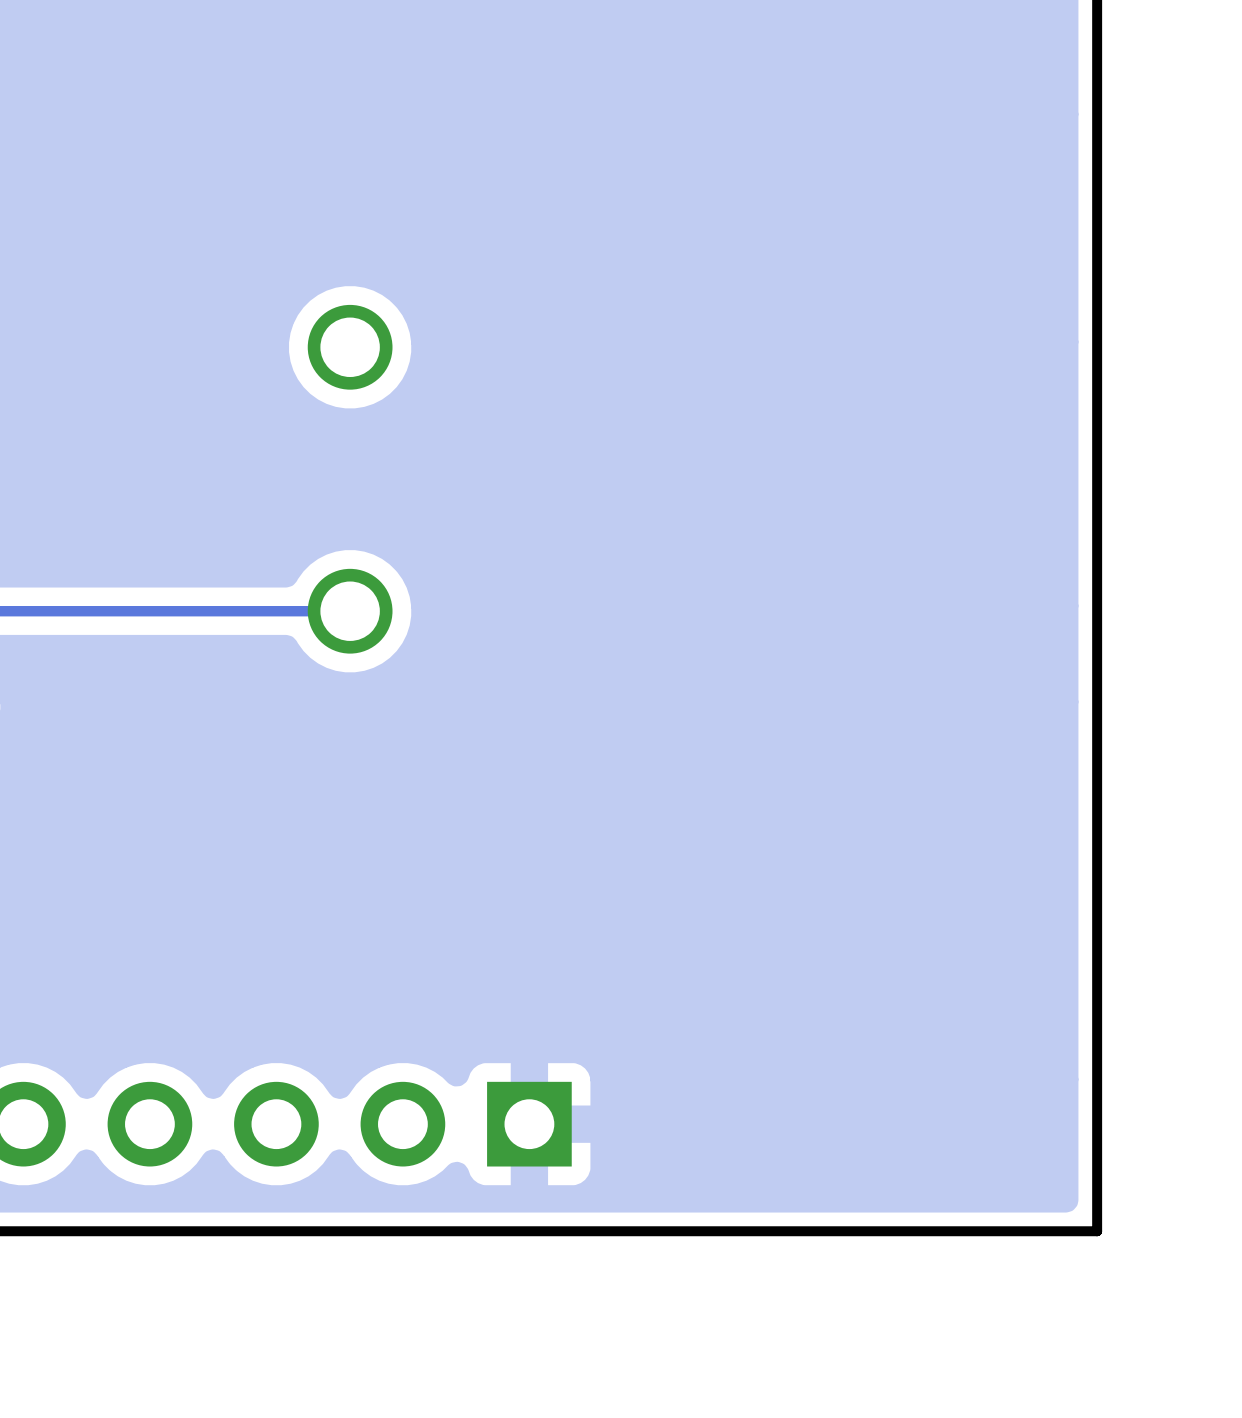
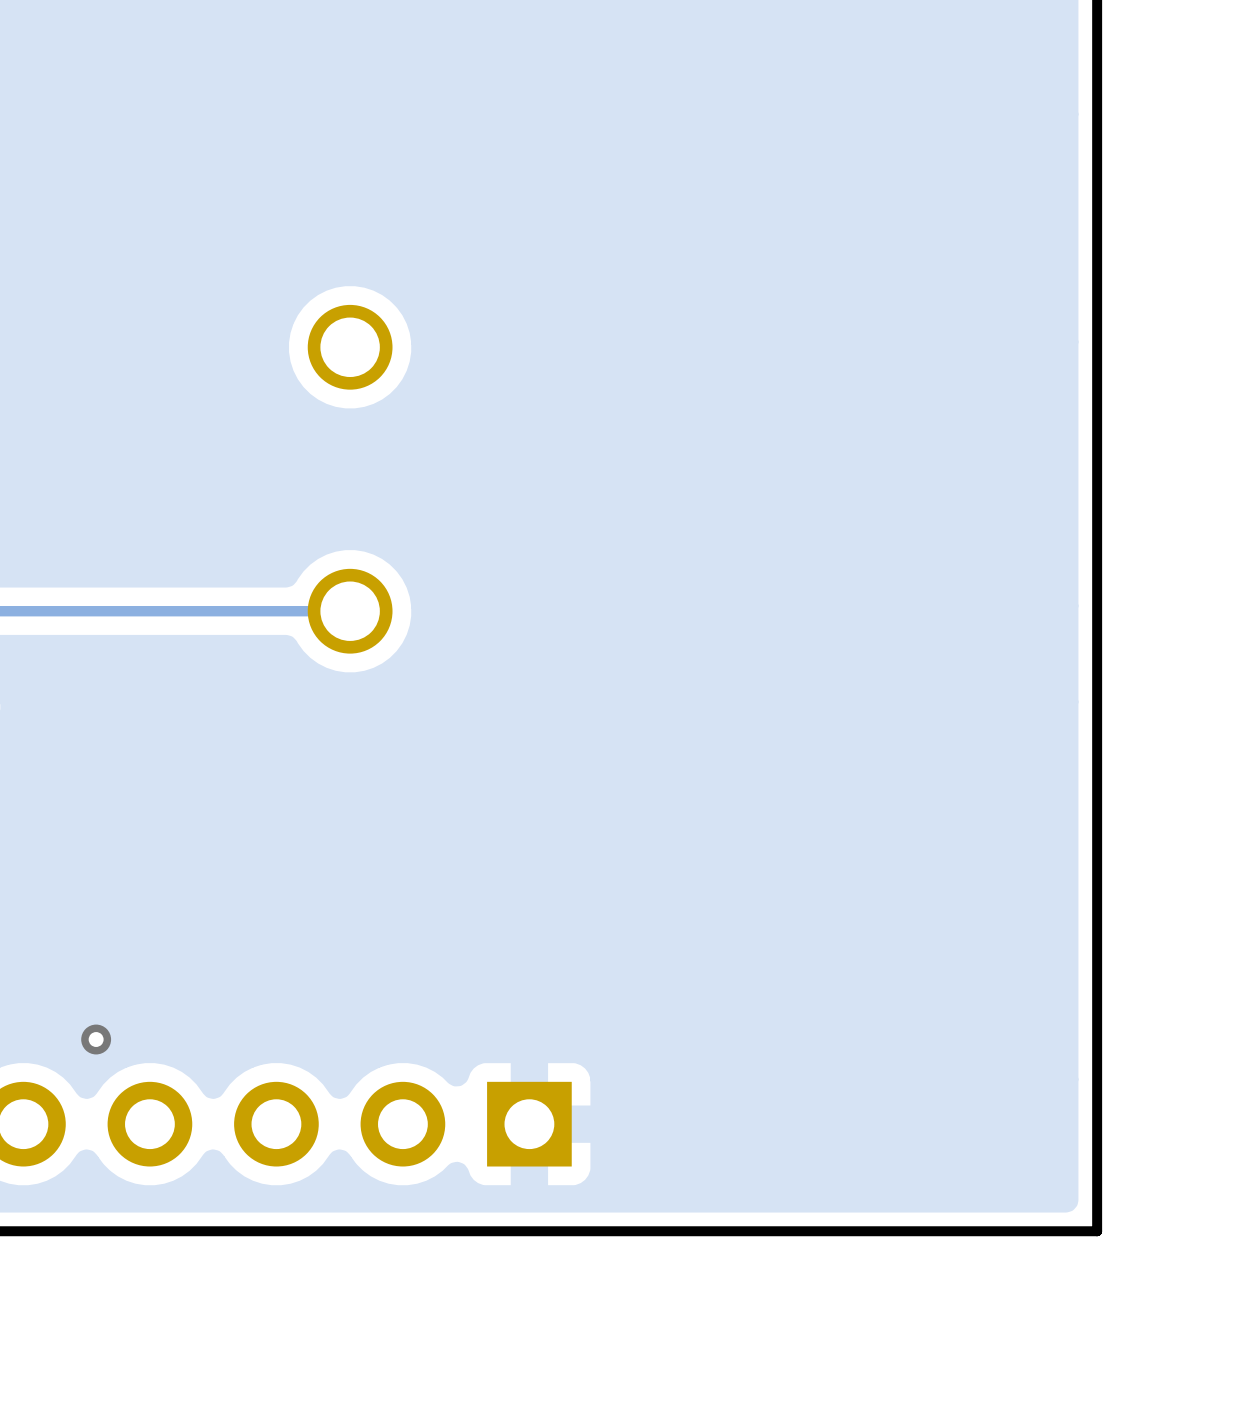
via: none -> (96, 1039)

